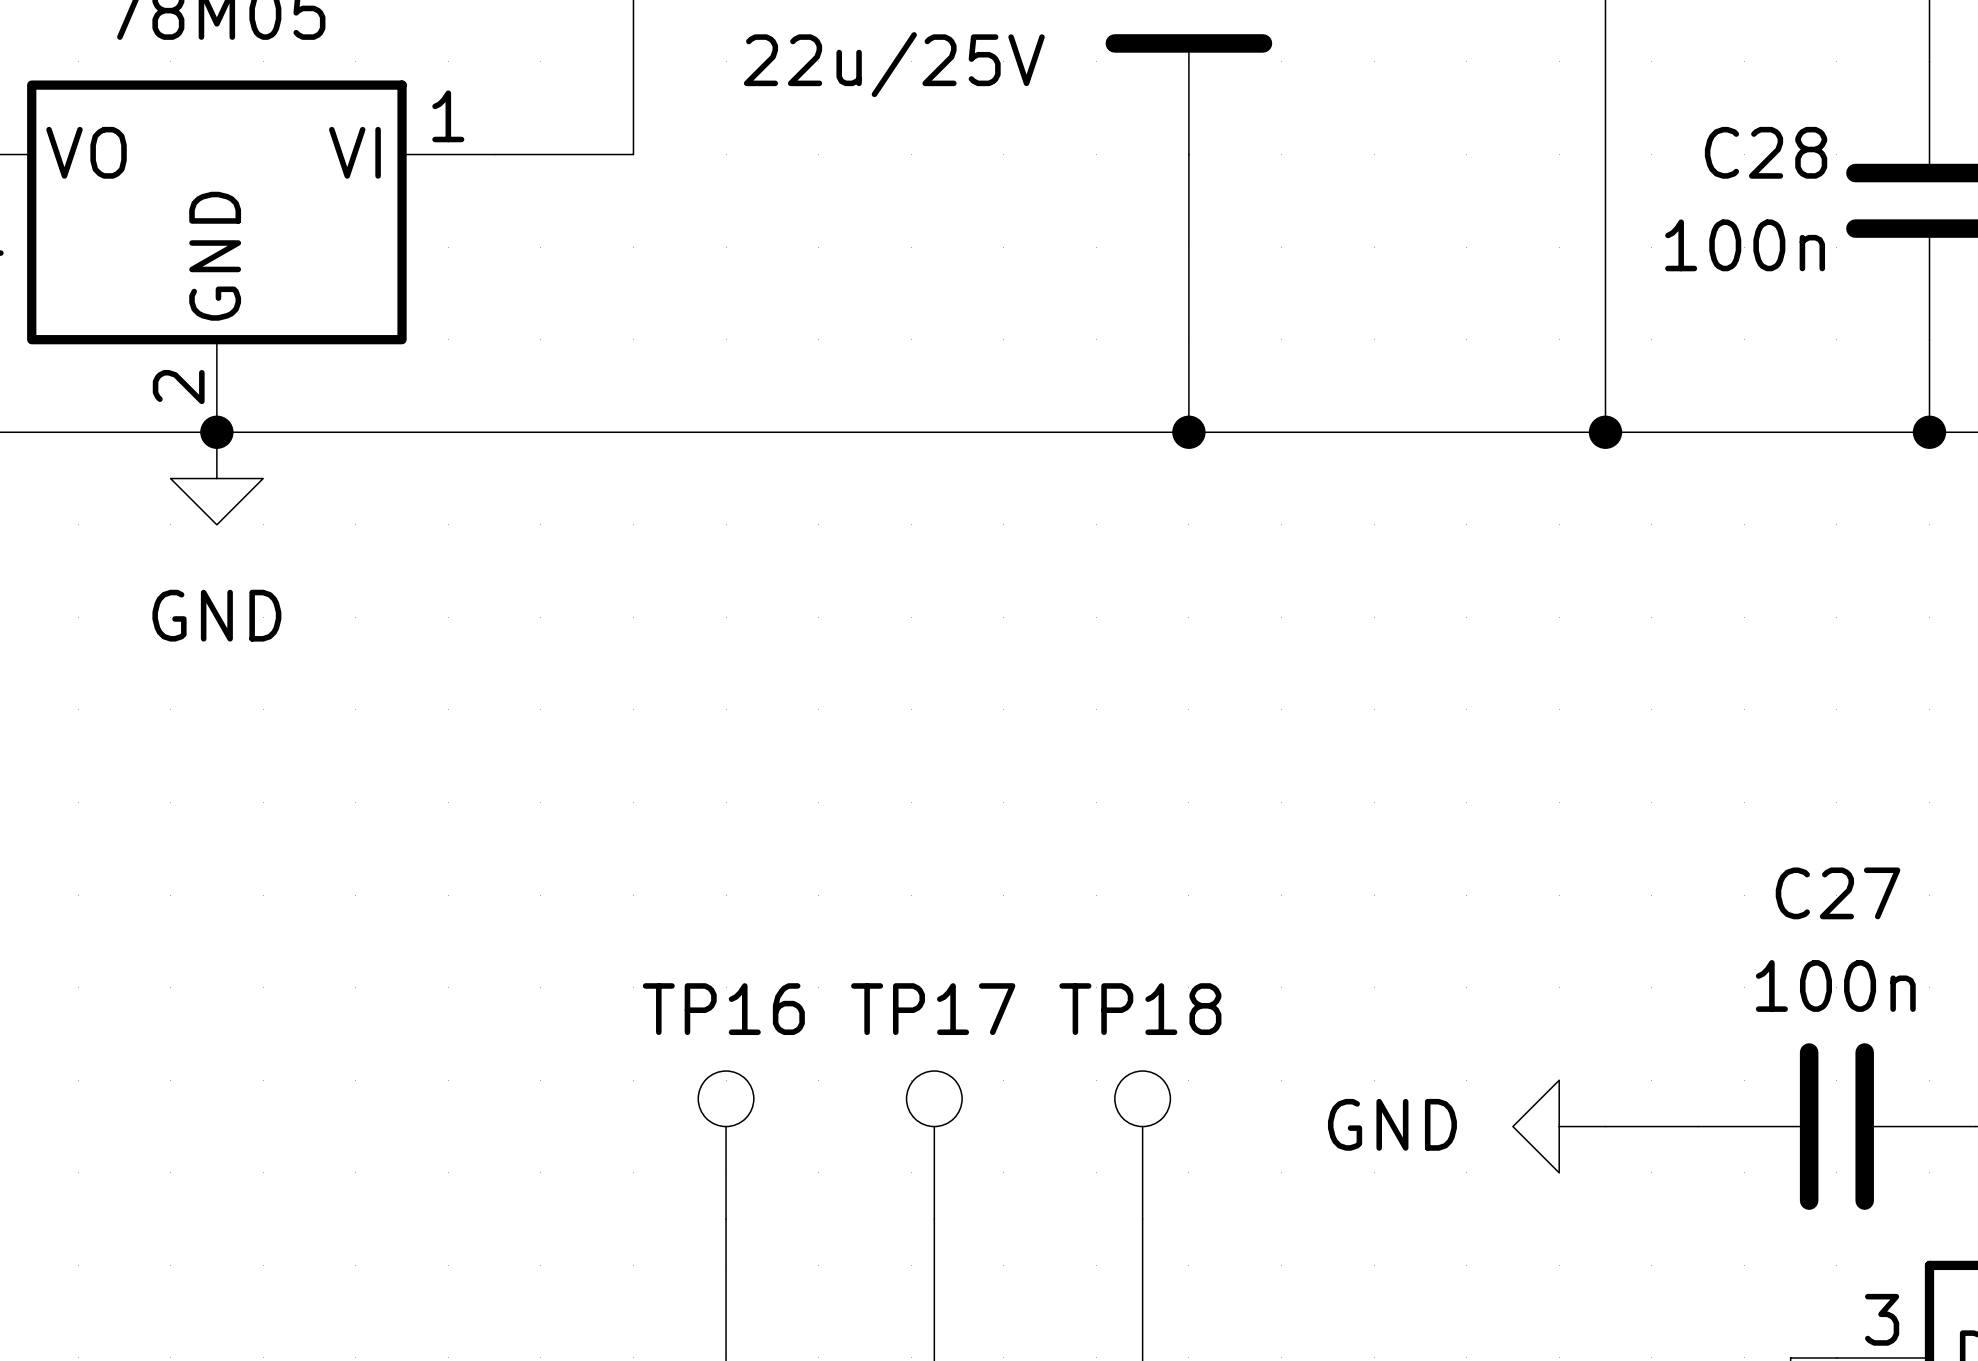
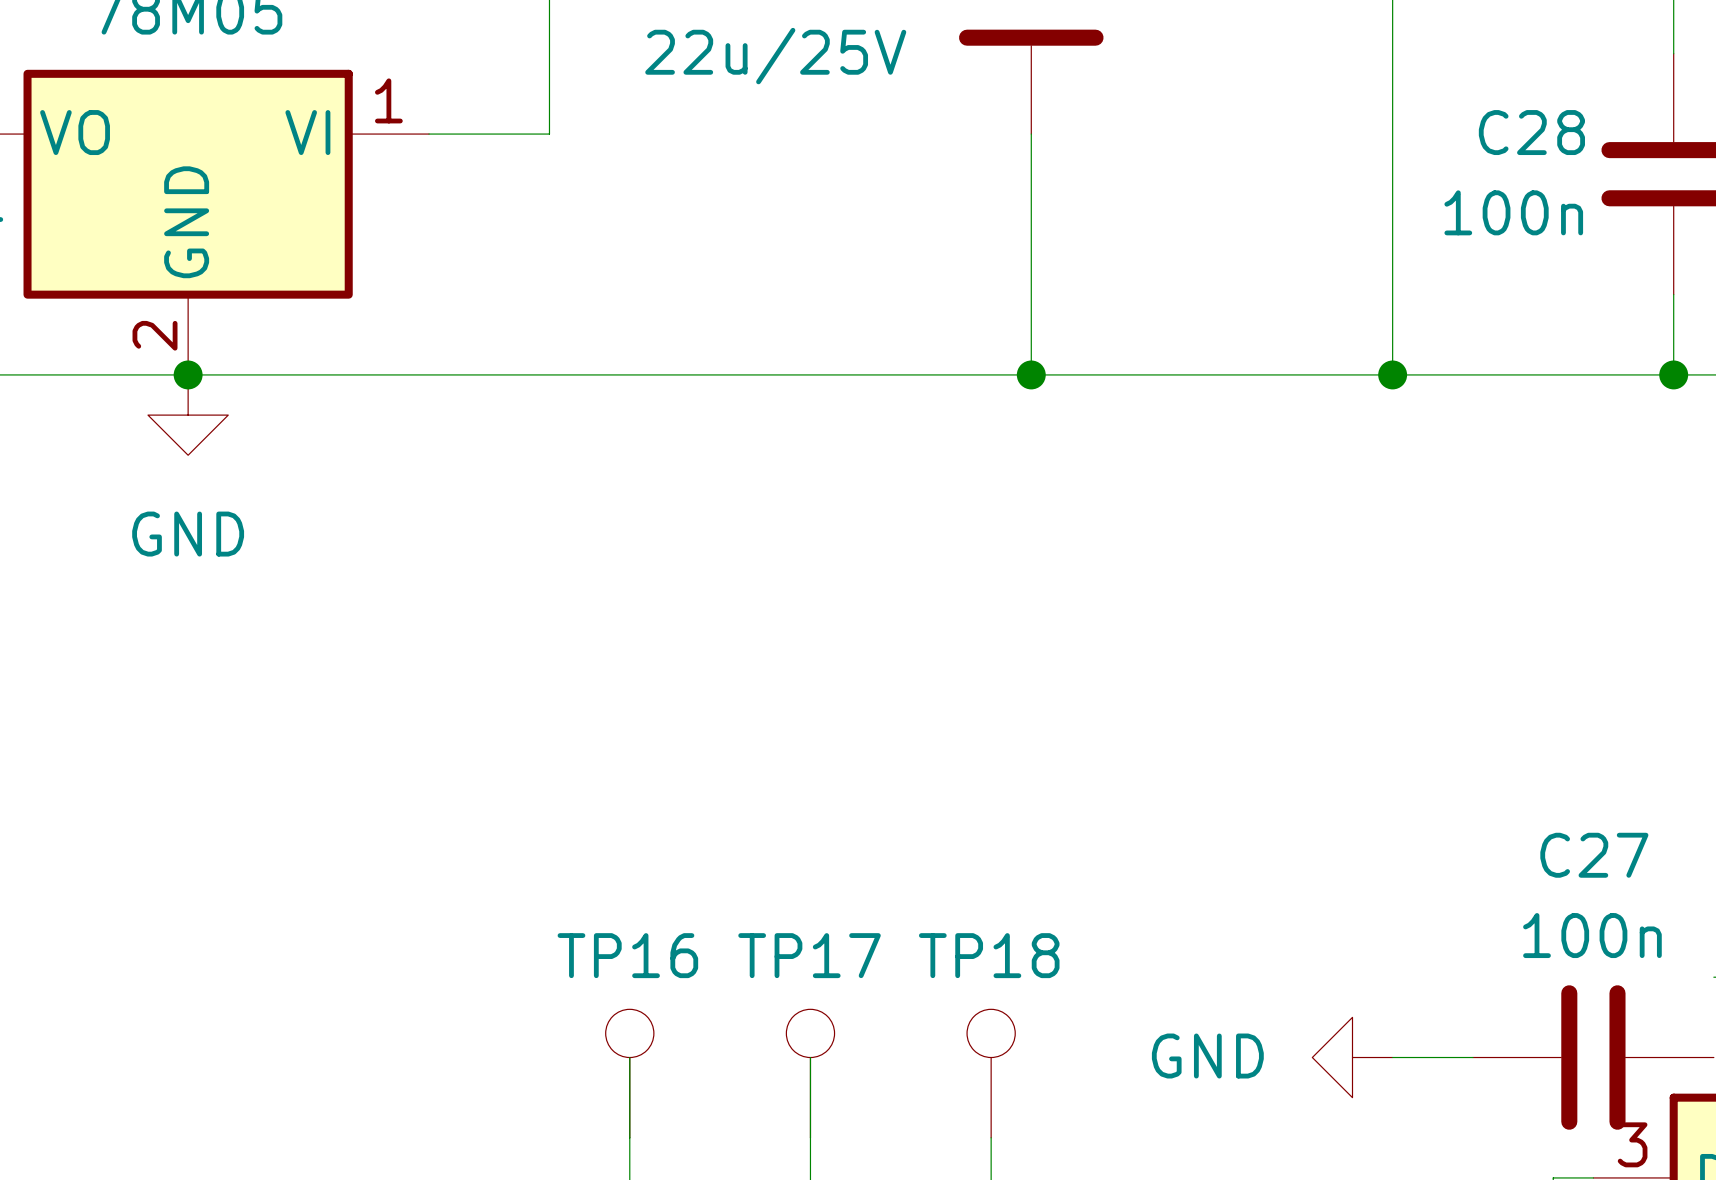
power symbol position: GND (1559, 1126) -> GND (1352, 1057)
wire: (1605, 1126) (1698, 1126) -> (1392, 1057) (1472, 1057)
C27 position: (1836, 1126) -> (1593, 1057)
TP16 position: (726, 1145) -> (629, 1073)
TP17 position: (934, 1145) -> (810, 1073)
TP18 position: (1142, 1145) -> (991, 1073)

